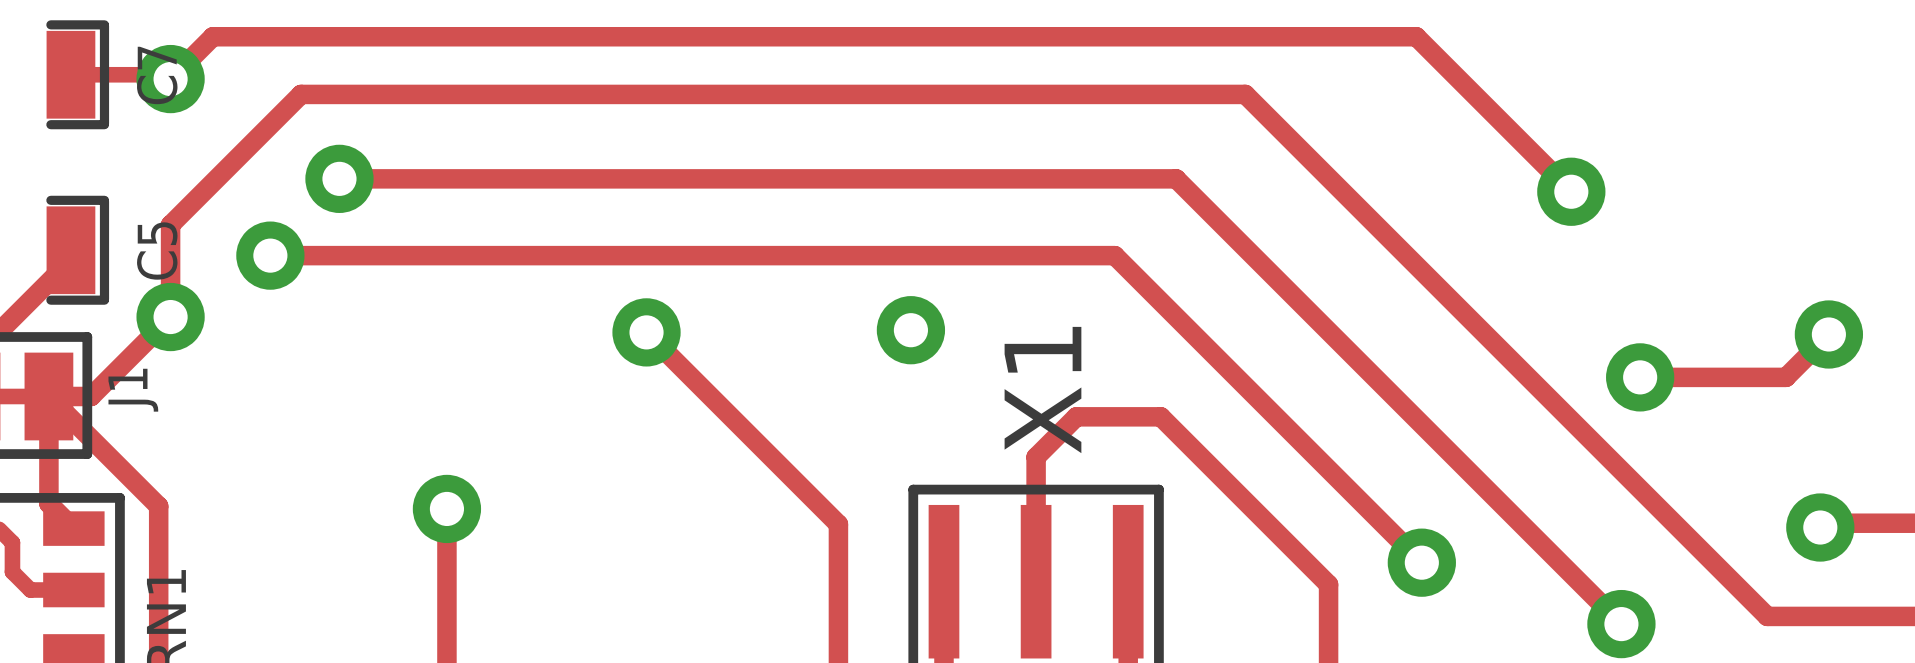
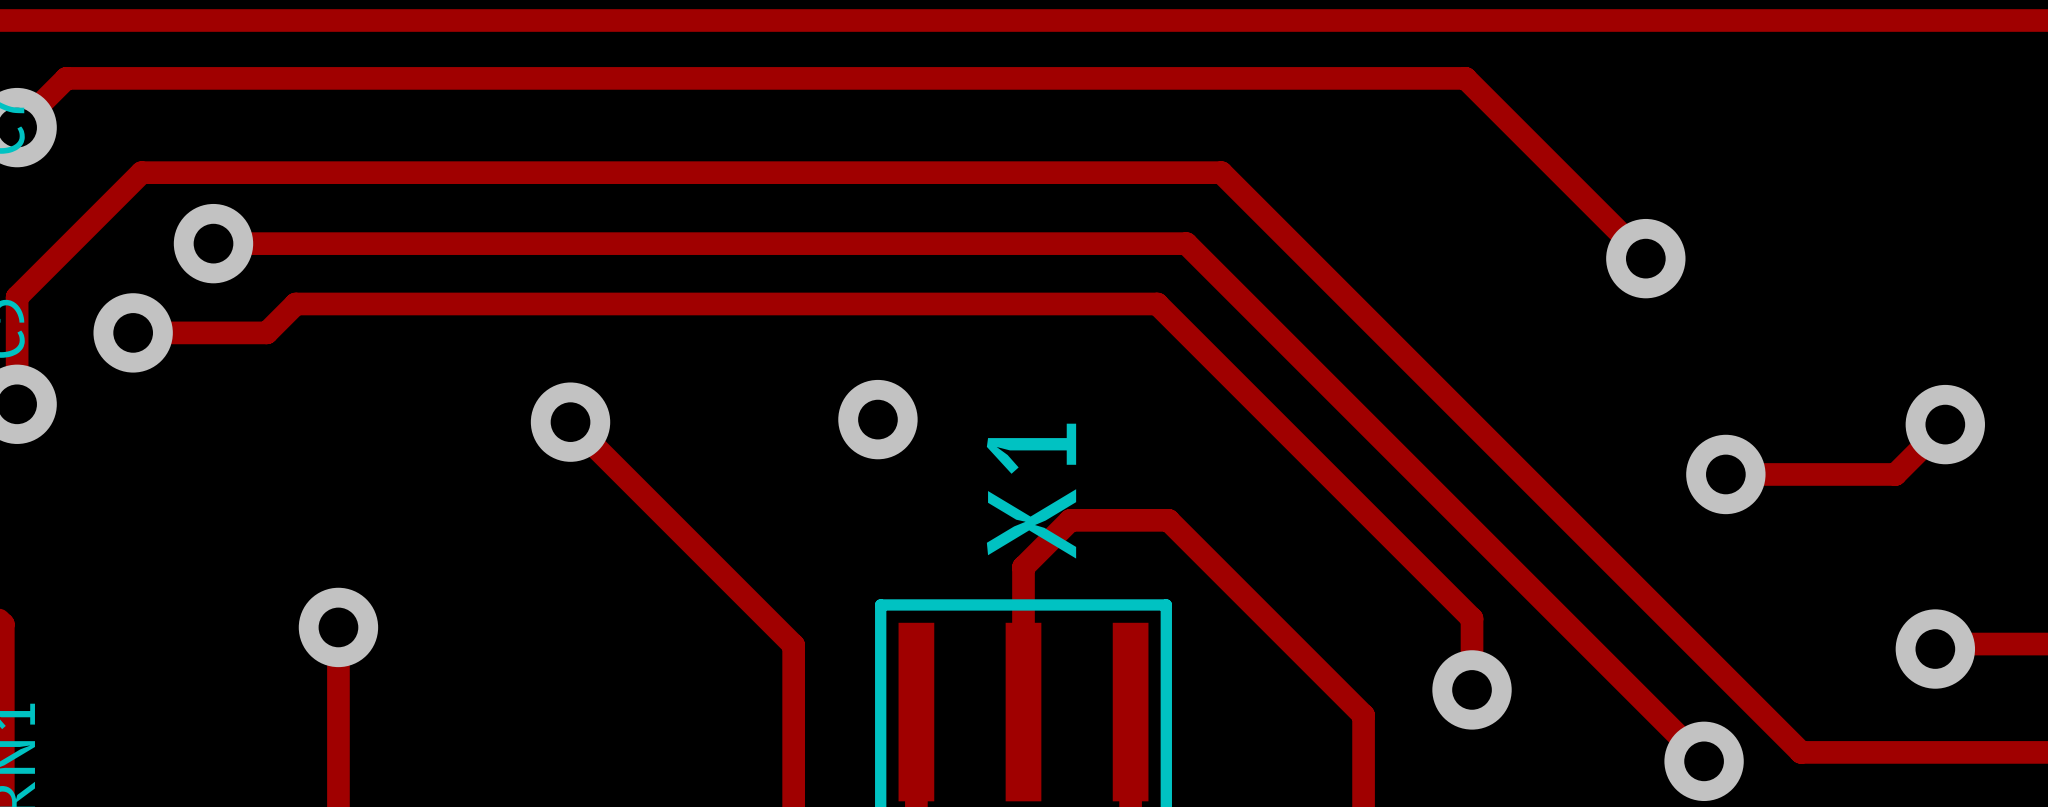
track: (277, 117) (301, 94) (1245, 94) (1767, 616) -> (141, 172) (1221, 172) (1801, 752) (1873, 752)
track: (385, 255) (1114, 255) (1421, 562) -> (266, 332) (295, 303) (1157, 303) (1472, 618) (1472, 689)

